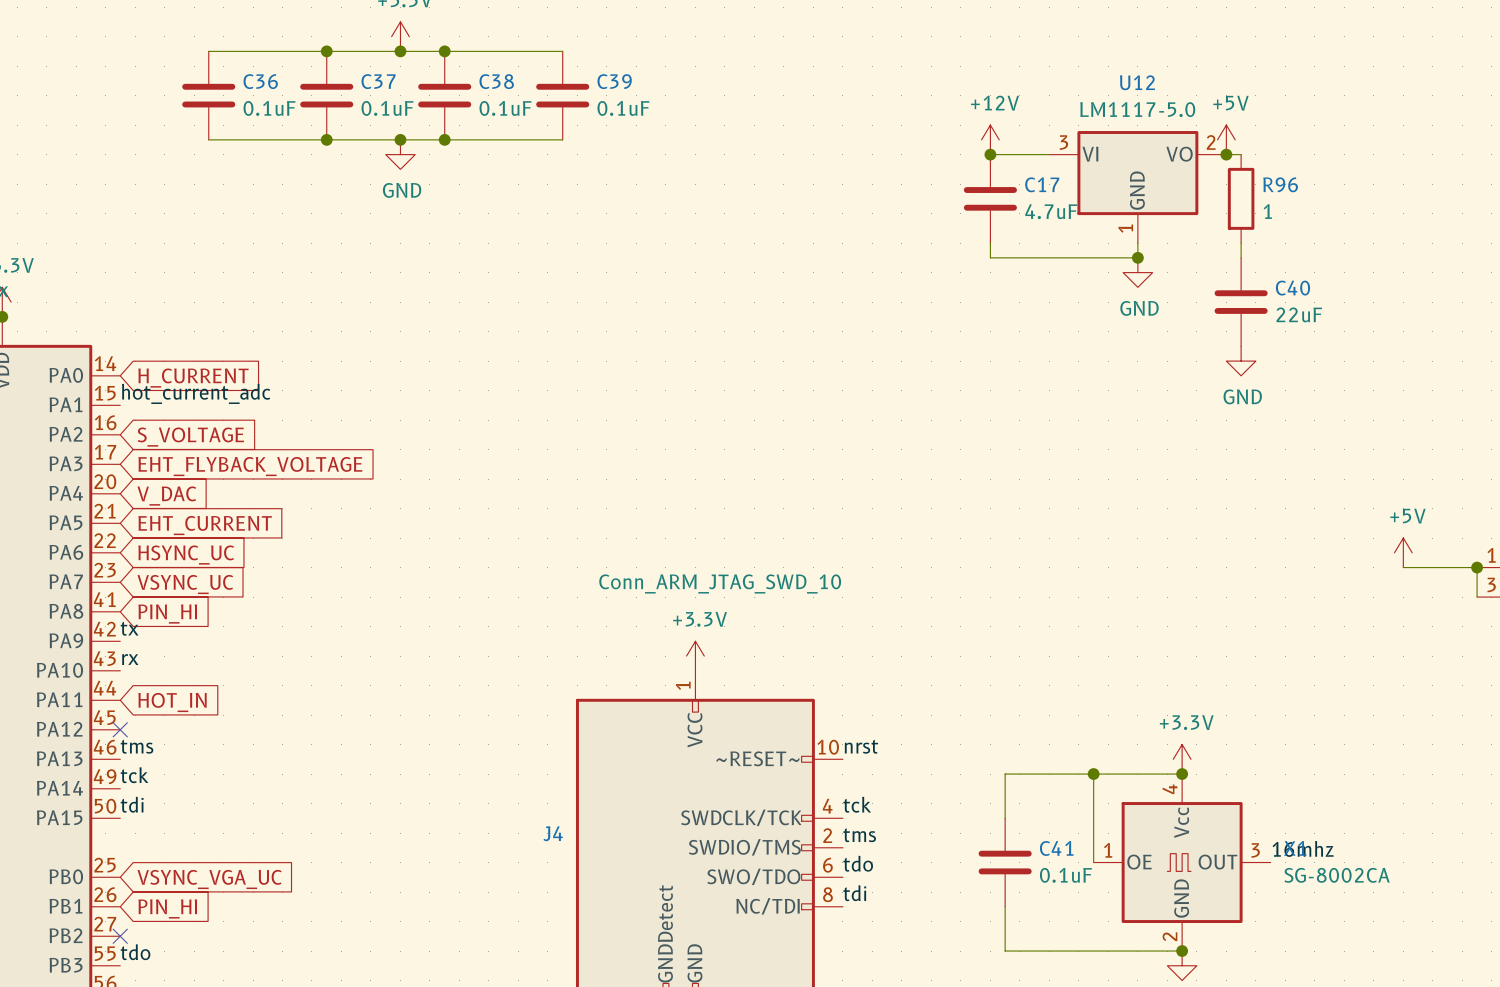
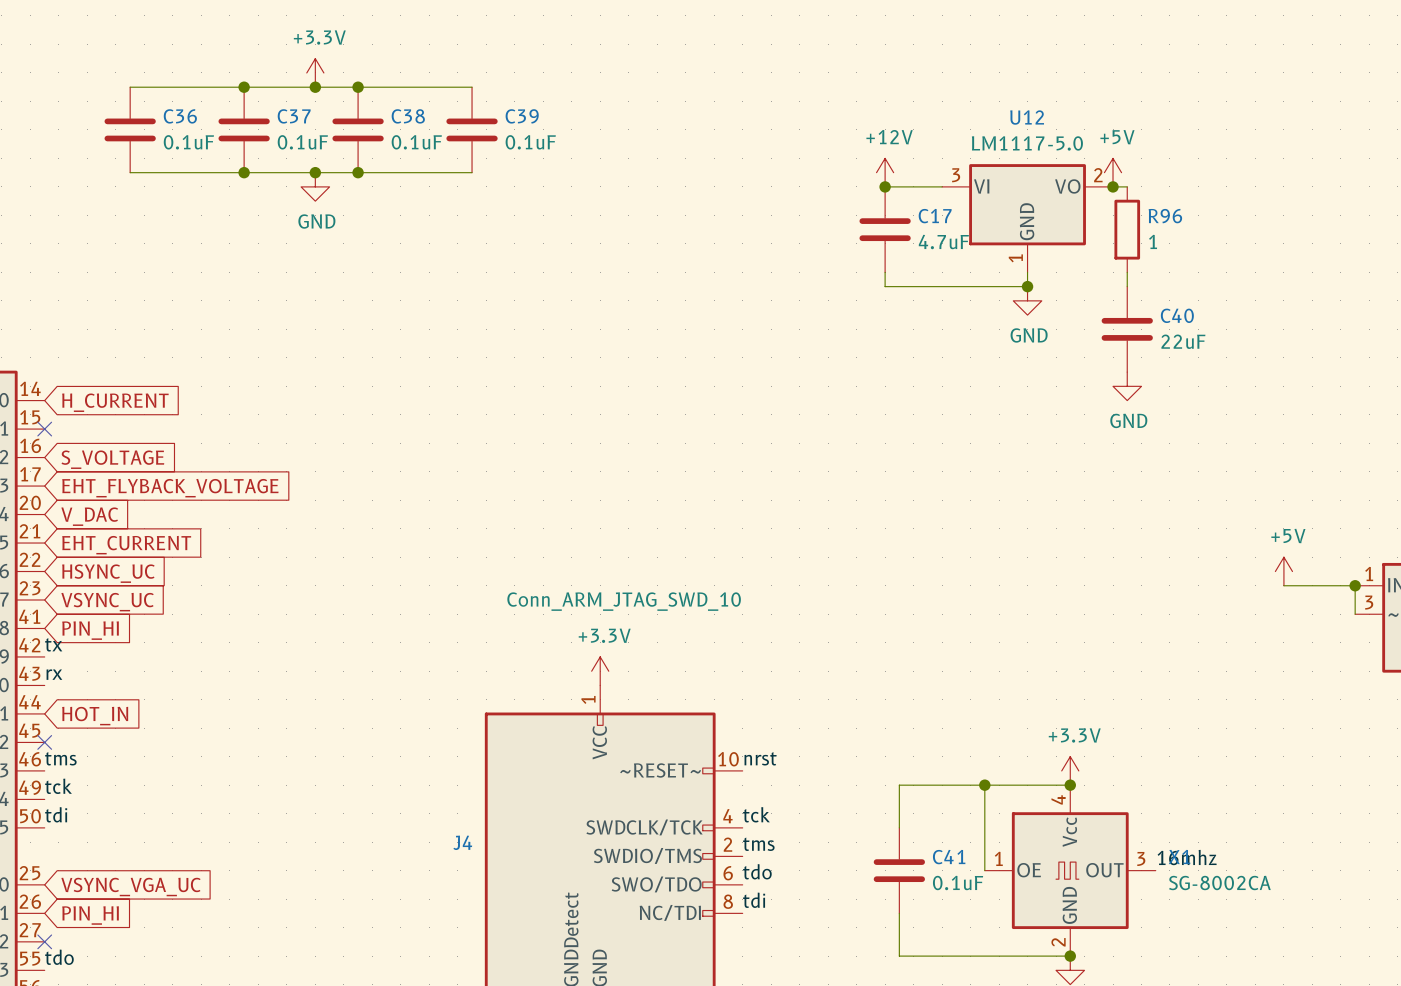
label: hot_current_adc (196, 393) -> none
no-connect mark: none -> (44, 429)

